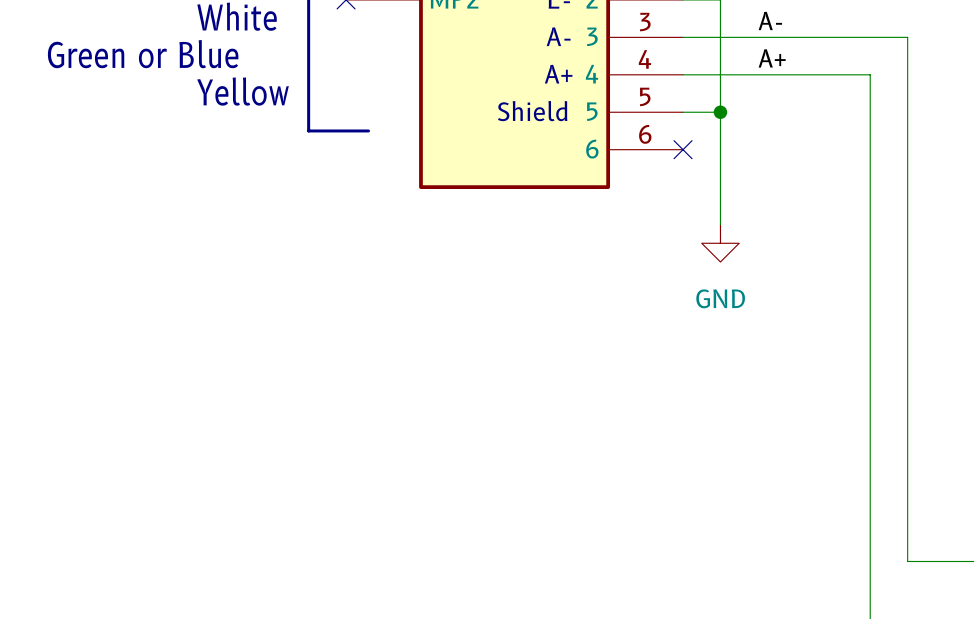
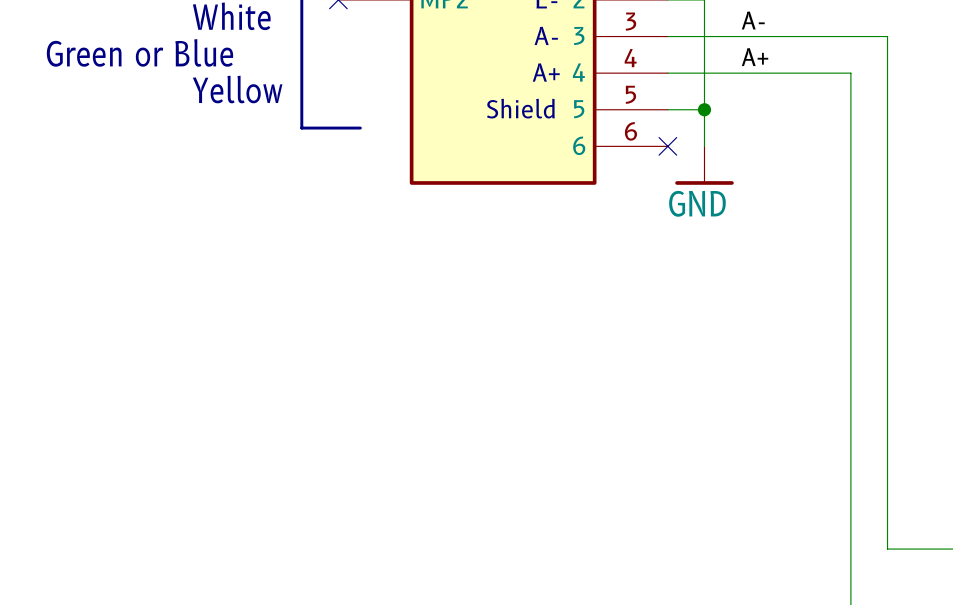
power symbol: none -> GND (704, 165)
power symbol: GND (720, 243) -> none

